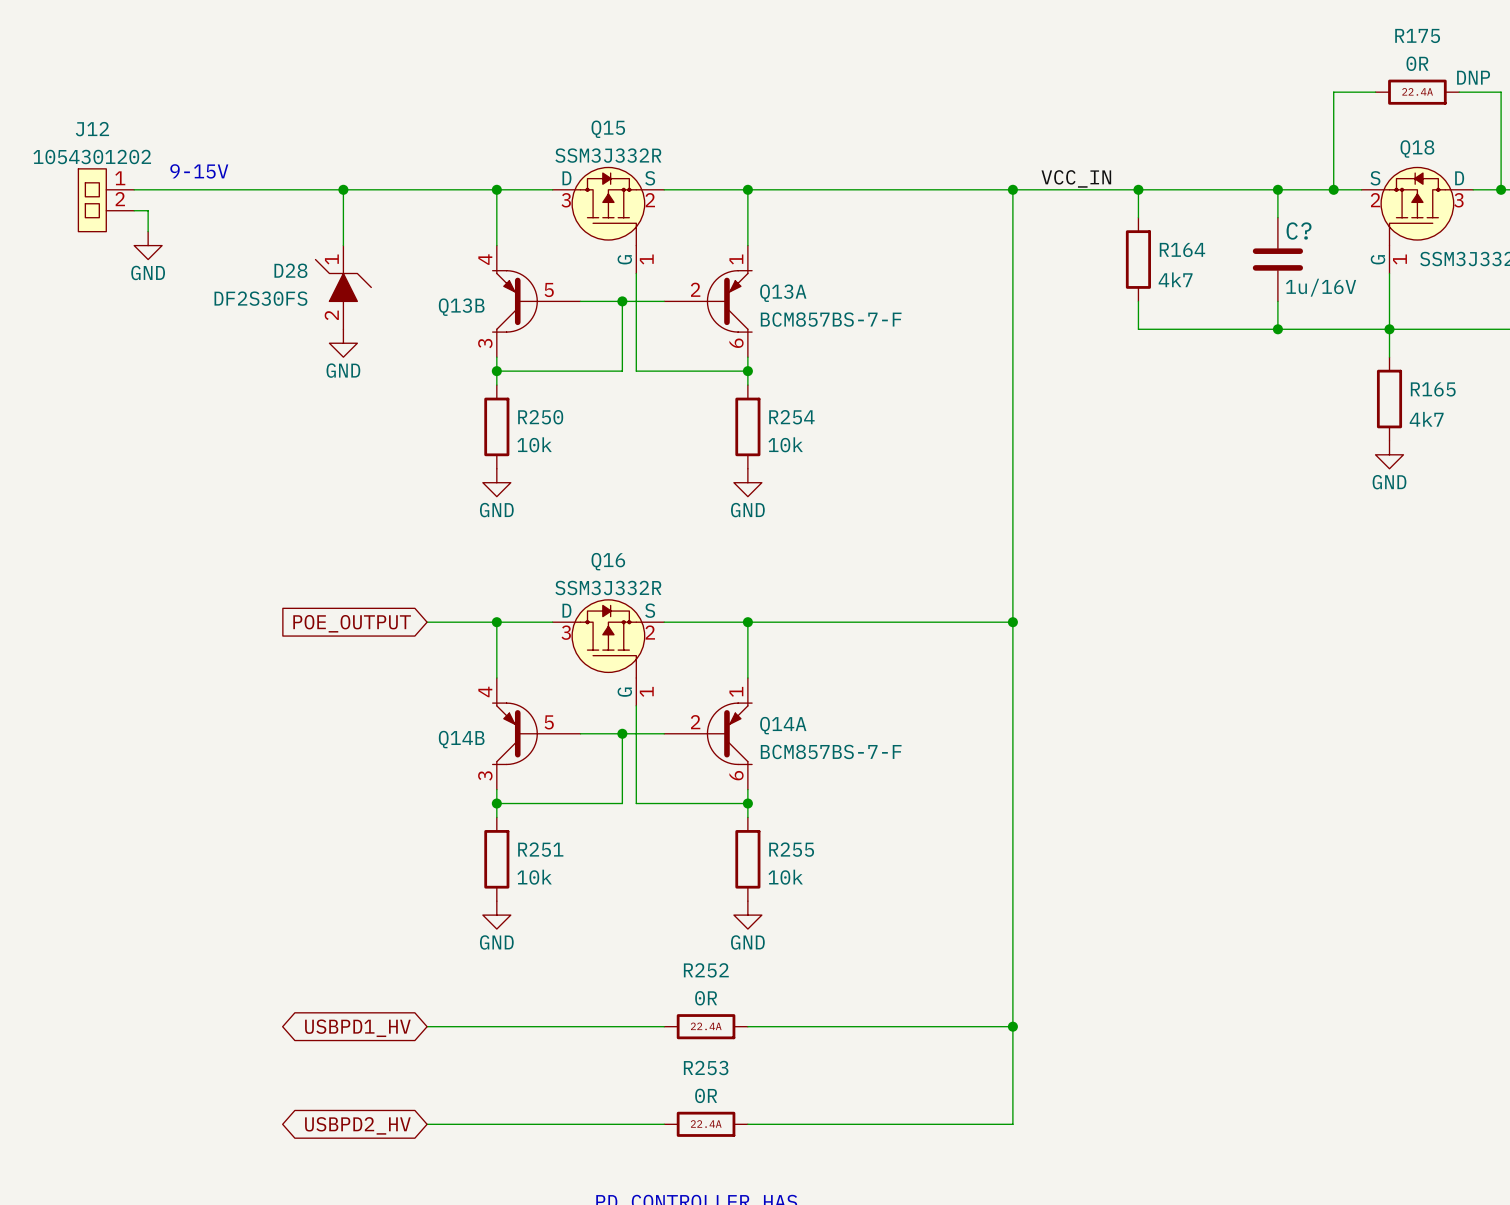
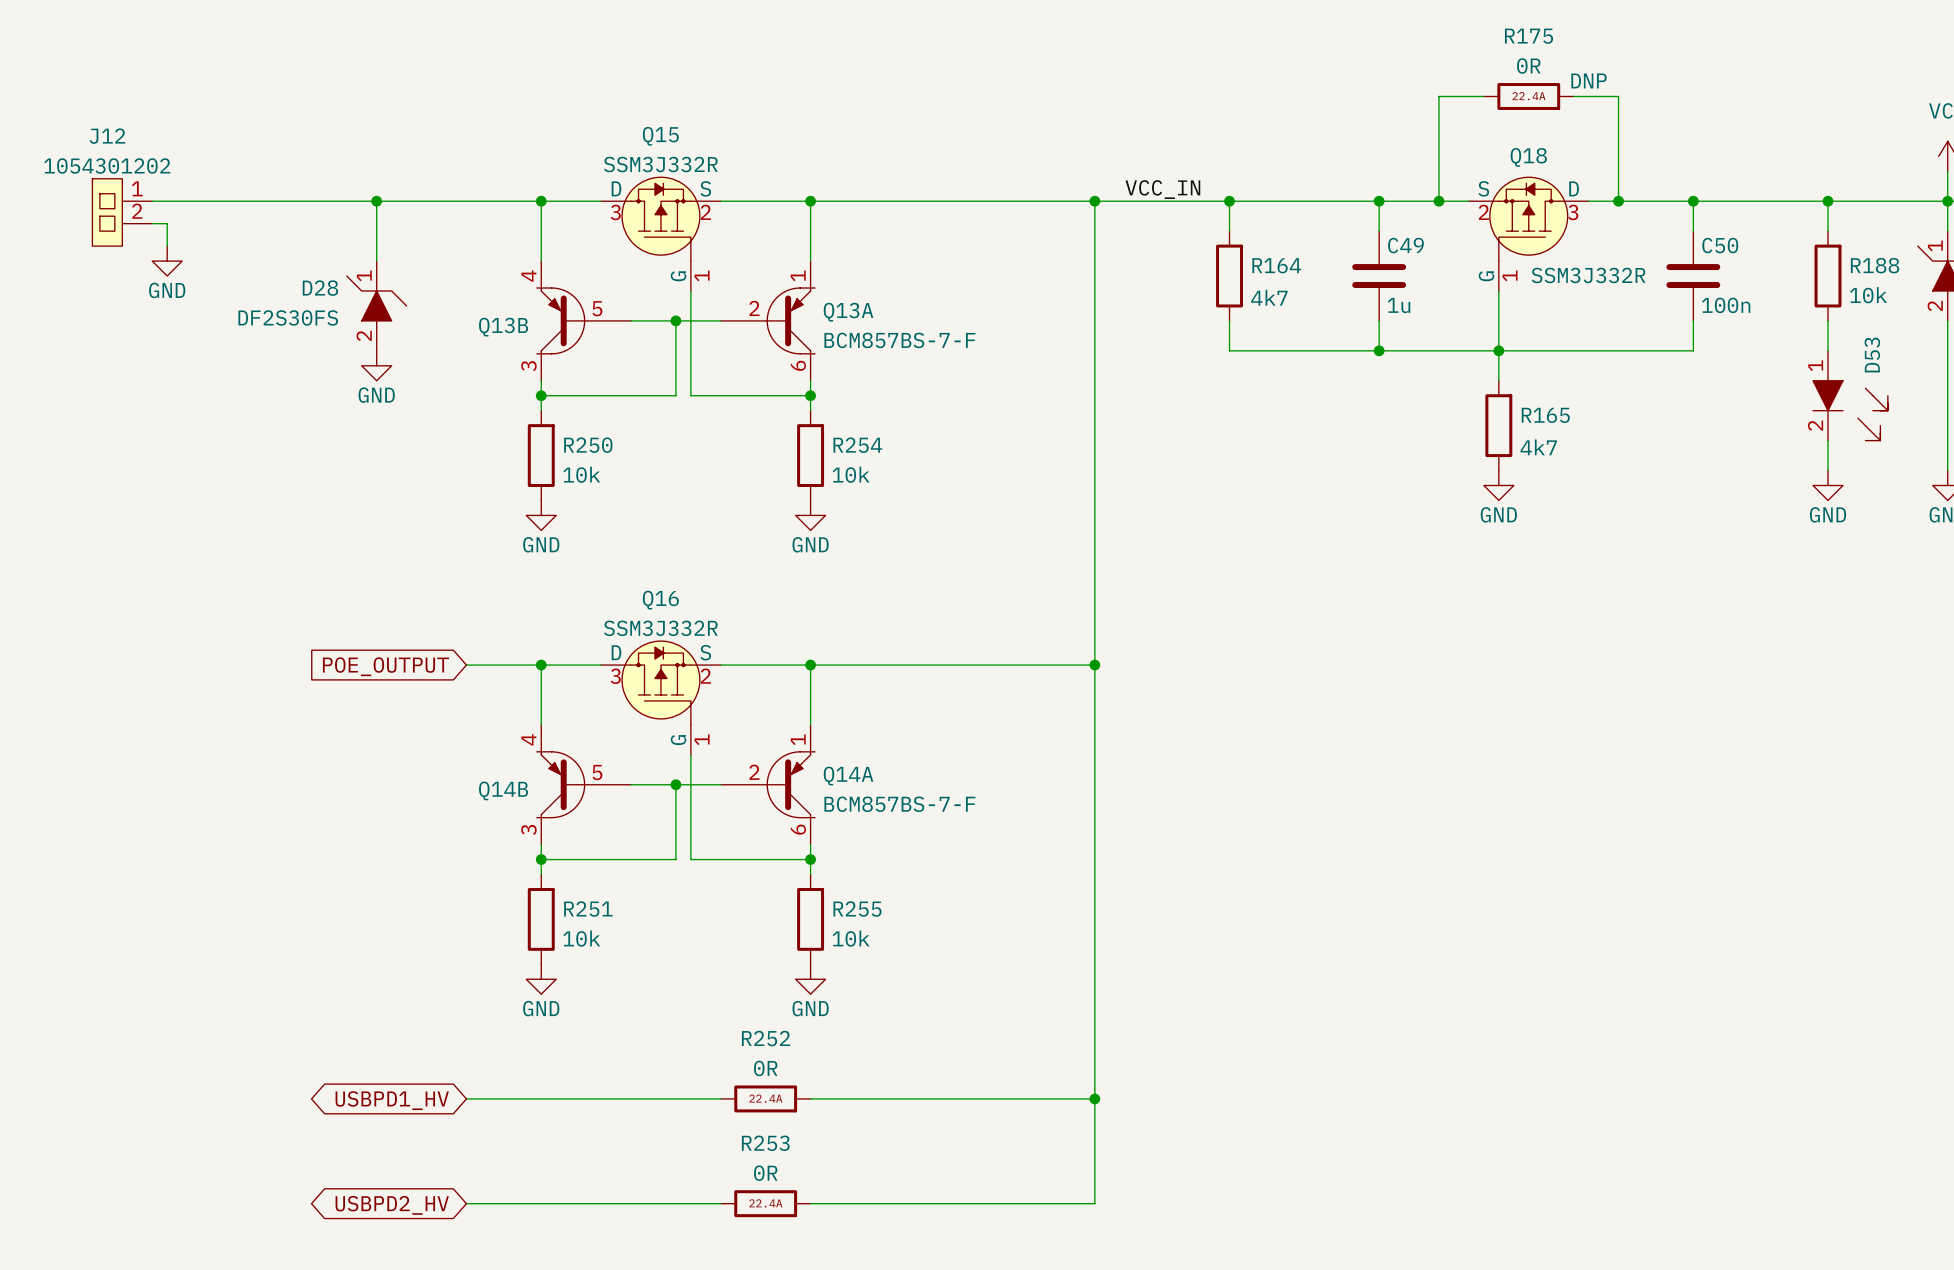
text: 9-15V (199, 171) -> none
C? name: C? (1299, 231) -> C49 (1405, 245)
C? text: 1u/16V (1321, 287) -> 1u (1399, 305)

